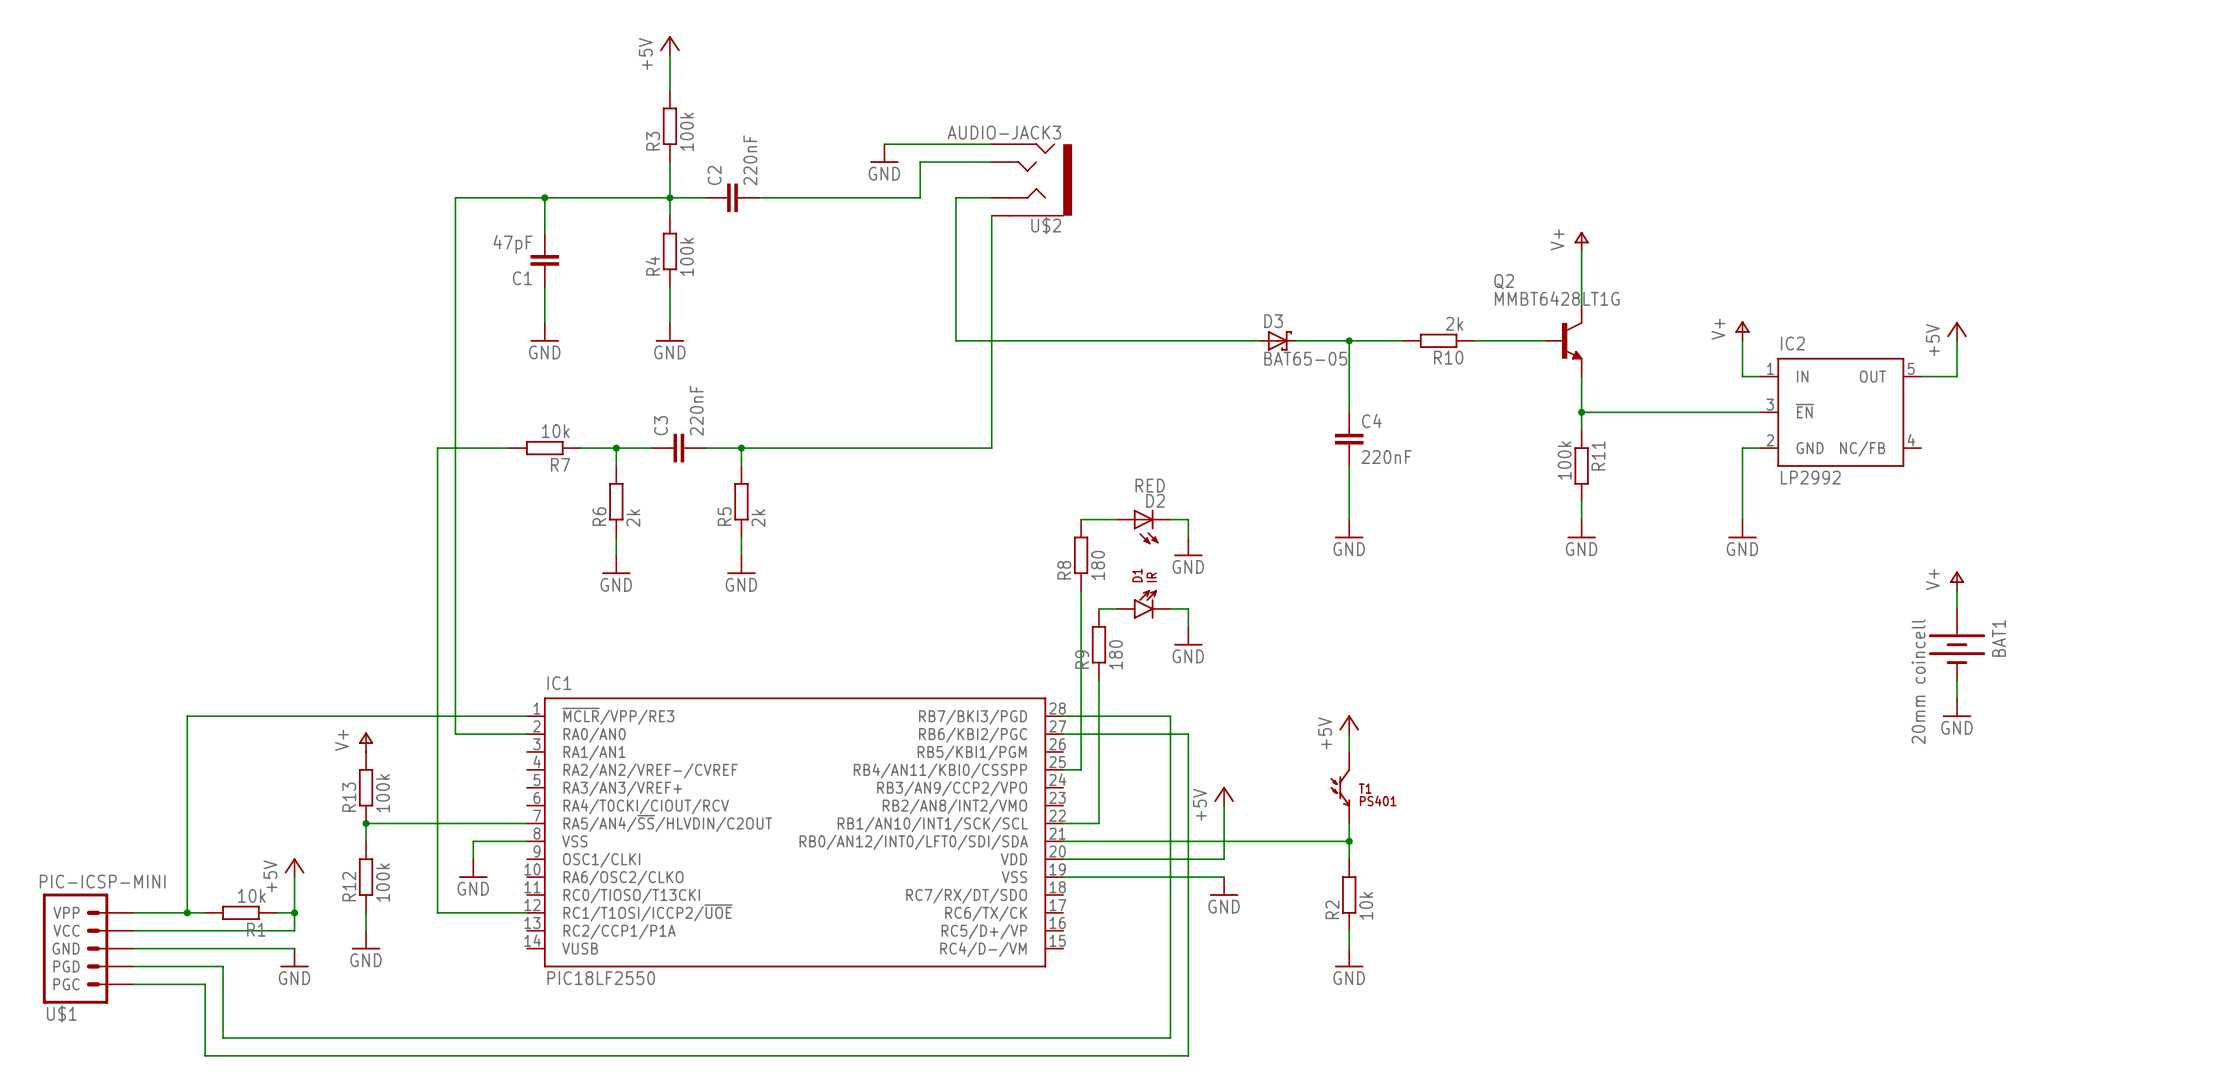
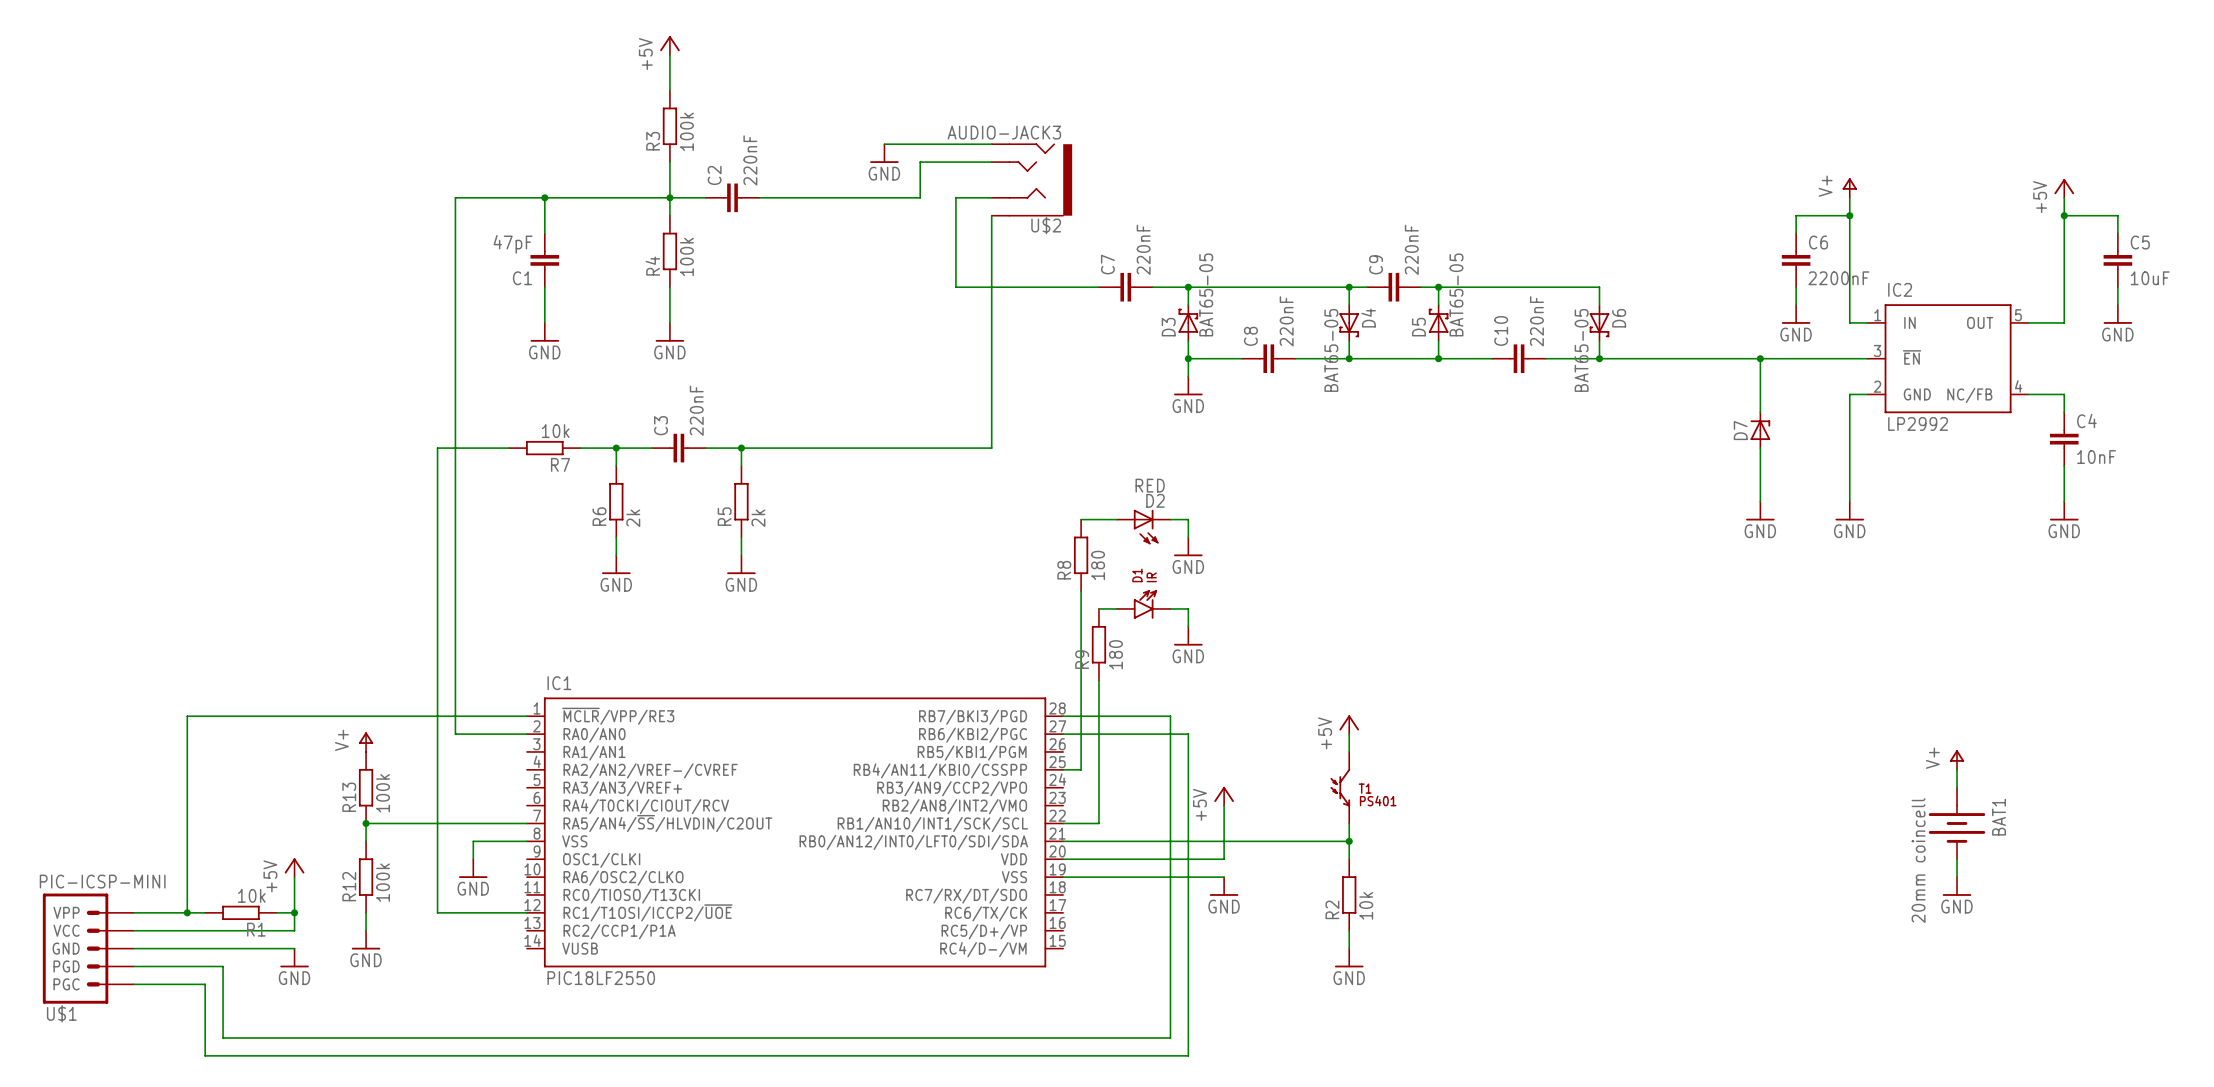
power symbol: none -> V+ (1849, 187)
power symbol: none -> +5V (2064, 188)
wire: none -> (1849, 197) (1849, 322) (1867, 322)
wire: none -> (2064, 197) (2064, 322) (2028, 322)
wire: none -> (1849, 215) (1796, 215) (1796, 233)
junction: none -> (1849, 215)
wire: none -> (2064, 215) (2117, 215) (2117, 233)
junction: none -> (2064, 215)
power symbol: V+ (1581, 241) -> none
wire: (1581, 251) (1581, 305) -> none
C6: none -> 2200nF (1796, 260)
C5: none -> 10uF (2117, 260)
wire: (955, 287) (955, 340) (1259, 340) -> (955, 287) (1098, 287)
C7: none -> 220nF (1125, 287)
wire: none -> (1152, 287) (1367, 287)
wire: none -> (1188, 287) (1188, 305)
junction: none -> (1188, 287)
wire: none -> (1349, 287) (1349, 305)
junction: none -> (1349, 287)
C9: none -> 220nF (1393, 287)
wire: none -> (1420, 287) (1599, 287) (1599, 305)
wire: none -> (1438, 287) (1438, 305)
junction: none -> (1438, 287)
wire: none -> (1796, 287) (1796, 305)
wire: none -> (2117, 287) (2117, 305)
power symbol: none -> GND (1796, 314)
power symbol: none -> GND (2117, 314)
D4: none -> BAT65-05 (1349, 322)
D5: none -> BAT65-05 (1438, 322)
D6: none -> BAT65-05 (1599, 322)
power symbol: V+ (1742, 331) -> none
power symbol: +5V (1957, 331) -> none
wire: none -> (1188, 340) (1188, 376)
D3 position: (1277, 340) -> (1188, 322)
D3 rotation: 0° (1279, 340) -> 90° counterclockwise (1188, 320)
wire: (1295, 340) (1402, 340) -> none
junction position: (1349, 340) -> (1349, 358)
wire: none -> (1438, 340) (1438, 358)
R10: 2k (1438, 340) -> none
wire: (1474, 340) (1545, 340) -> none
Q2: MMBT6428LT1G (1564, 340) -> none
wire: (1742, 340) (1742, 376) (1760, 376) -> none
wire: (1957, 340) (1957, 376) (1921, 376) -> none
wire: none -> (1188, 358) (1241, 358)
junction: none -> (1188, 358)
C8: none -> 220nF (1268, 358)
wire: none -> (1295, 358) (1492, 358)
wire: (1349, 358) (1349, 412) -> none
junction: none -> (1438, 358)
C10: none -> 220nF (1519, 358)
wire: none -> (1545, 358) (1867, 358)
junction: none -> (1599, 358)
junction: none -> (1760, 358)
wire: (1581, 376) (1581, 430) -> none
power symbol: none -> GND (1188, 385)
wire: none -> (1867, 394) (1849, 394) (1849, 501)
wire: none -> (2028, 394) (2064, 394) (2064, 412)
wire: (1581, 412) (1760, 412) -> (1760, 358) (1760, 412)
junction: (1581, 412) -> none
IC2 position: (1840, 412) -> (1948, 358)
D7: none -> (1760, 430)
C4 position: (1349, 439) -> (2064, 439)
wire: (1760, 448) (1742, 448) (1742, 519) -> (1760, 448) (1760, 501)
C4 value: 220nF (1386, 457) -> 10nF (2096, 457)
wire: (1349, 465) (1349, 519) -> none
R11: 100k (1581, 465) -> none
wire: none -> (2064, 465) (2064, 501)
wire: (1581, 501) (1581, 519) -> (1599, 340) (1599, 358)
power symbol: none -> GND (1849, 511)
power symbol: none -> GND (2064, 511)
power symbol: GND (1349, 528) -> none
power symbol: GND (1581, 528) -> none
power symbol position: GND (1742, 528) -> GND (1760, 511)
power symbol: V+ (1957, 581) -> none
wire: (1957, 591) (1957, 608) -> none
BAT1 position: (1957, 644) -> (1957, 823)
wire: (1957, 680) (1957, 698) -> (1957, 769) (1957, 787)
power symbol: GND (1957, 707) -> none
power symbol: none -> V+ (1957, 760)
wire: none -> (1957, 859) (1957, 877)
power symbol: none -> GND (1957, 886)

